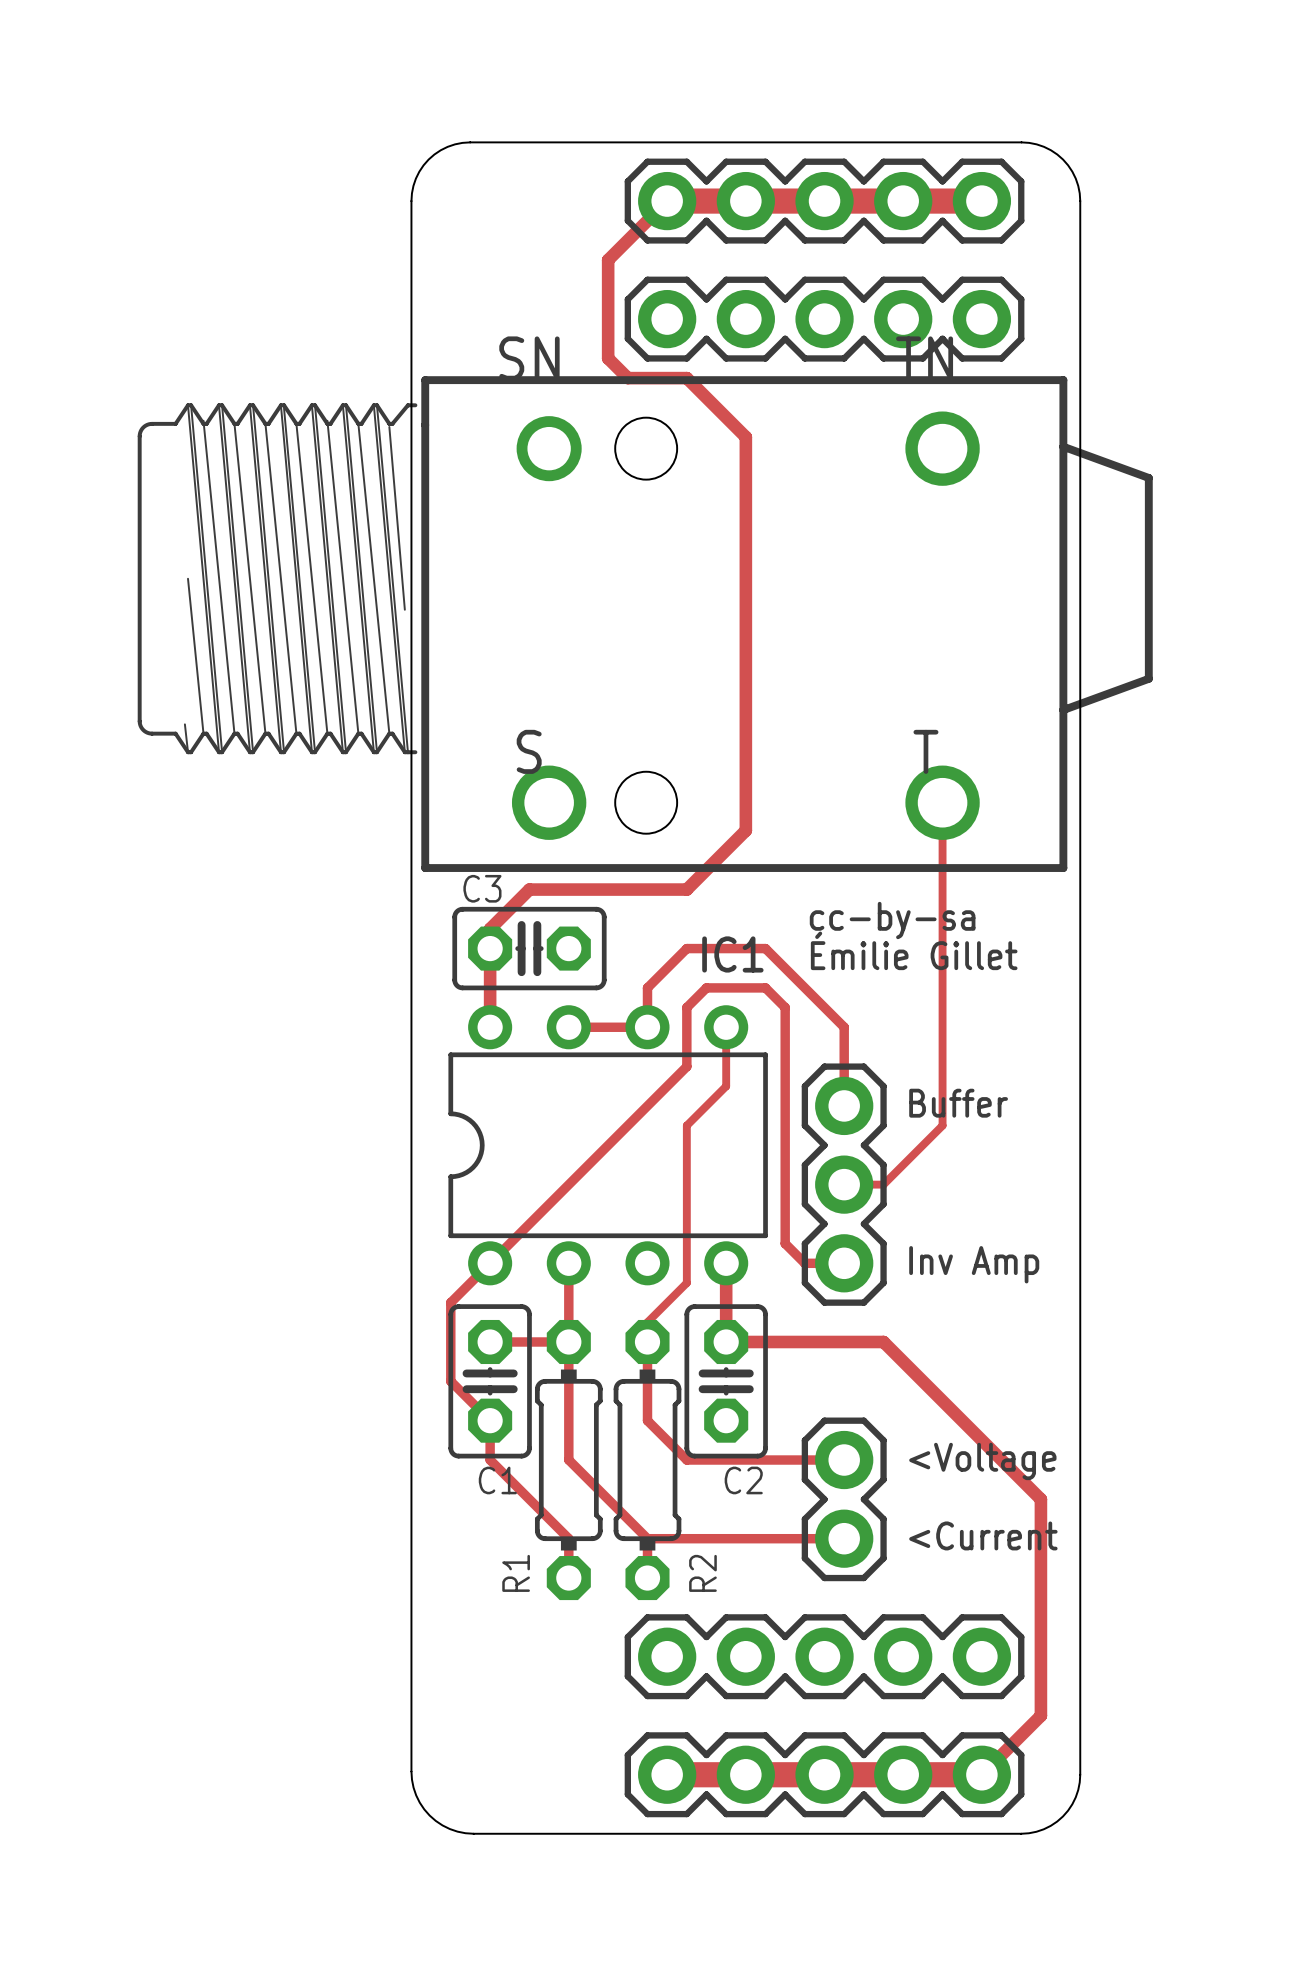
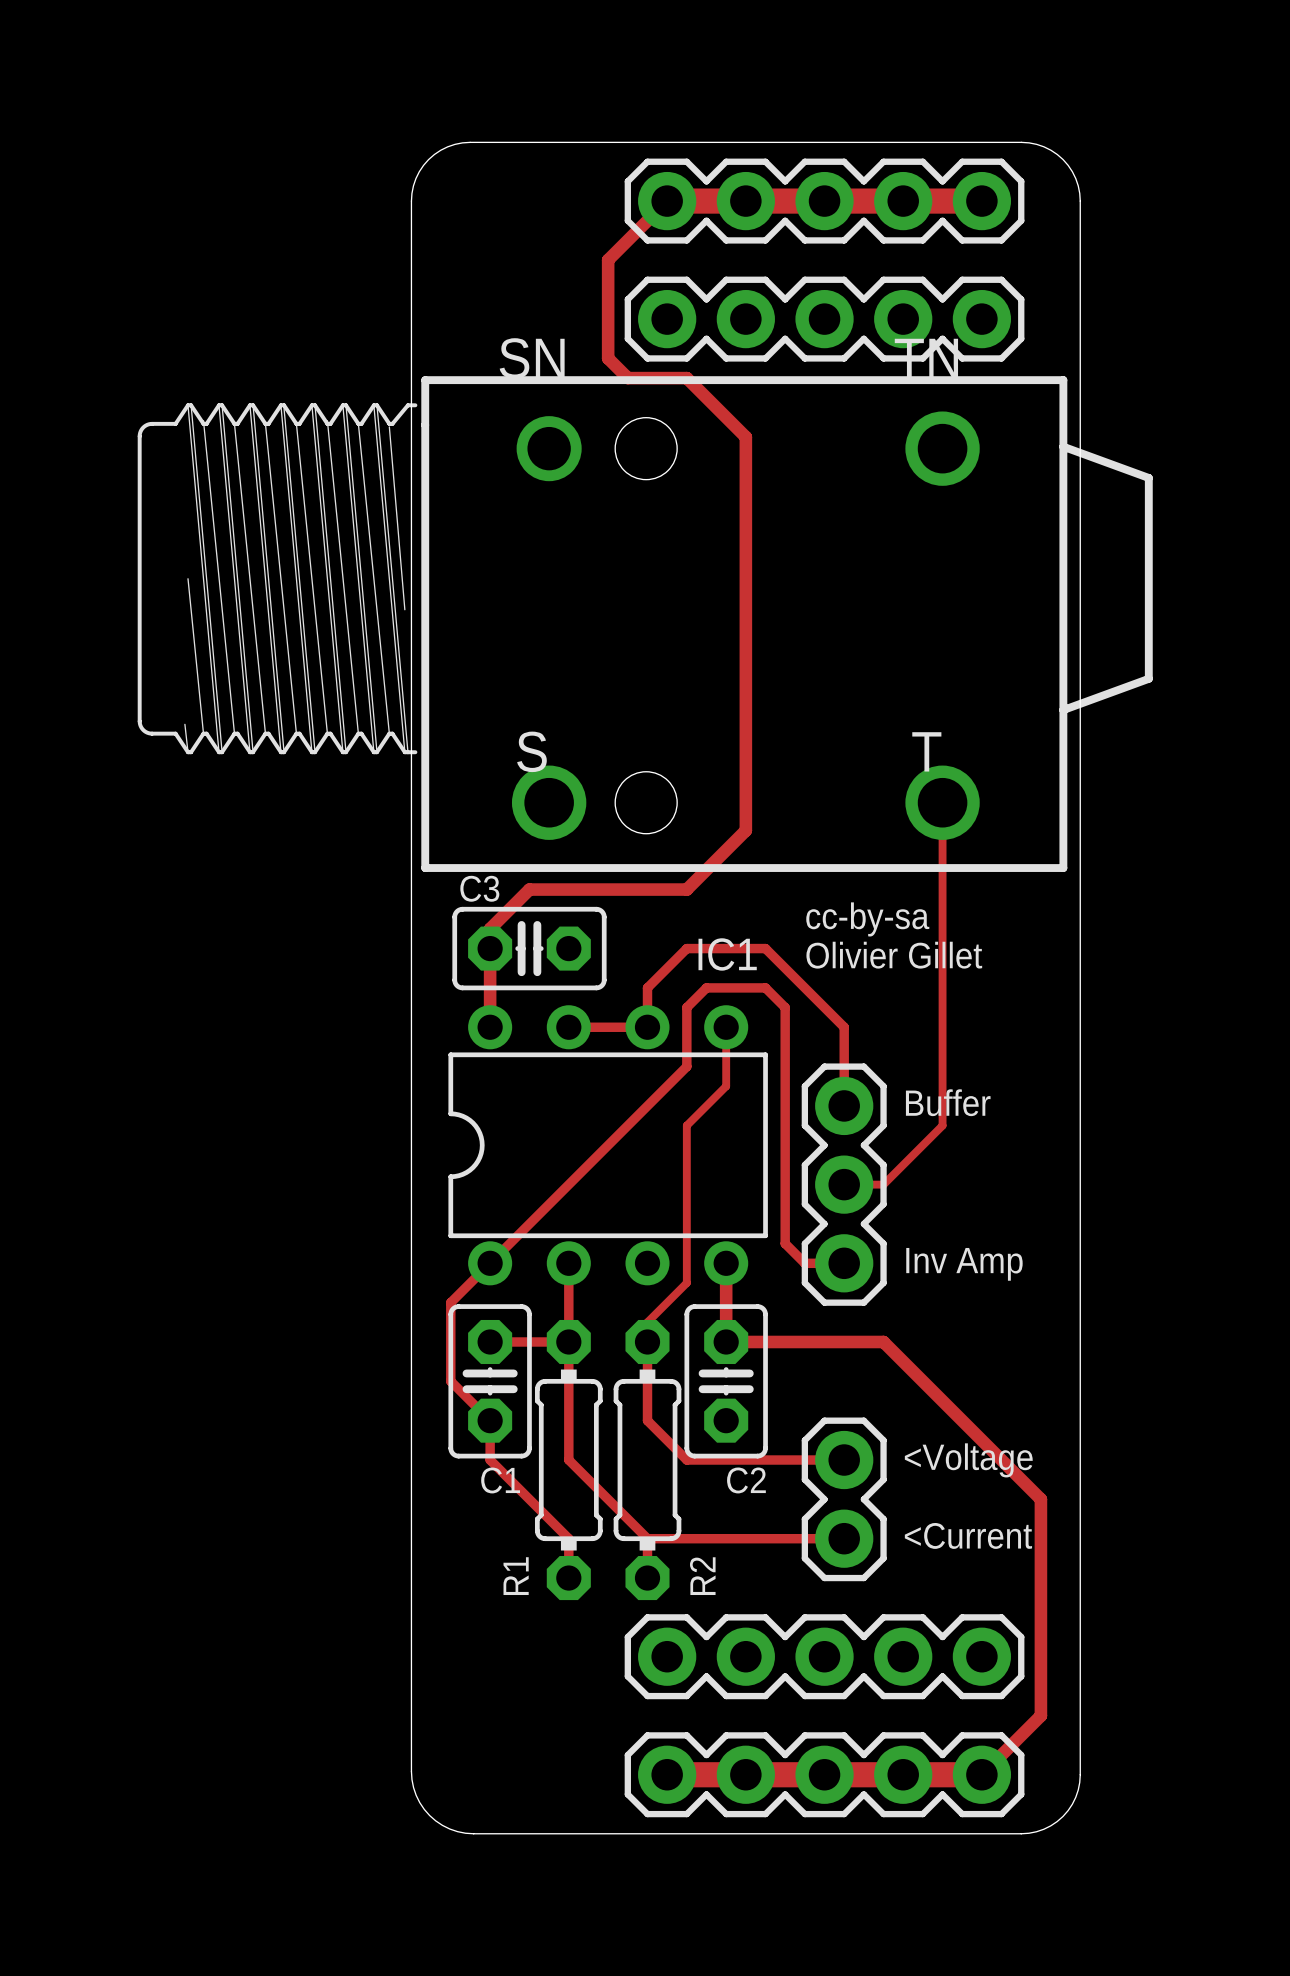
text: Émilie Gillet (914, 950) -> Olivier Gillet (894, 955)

